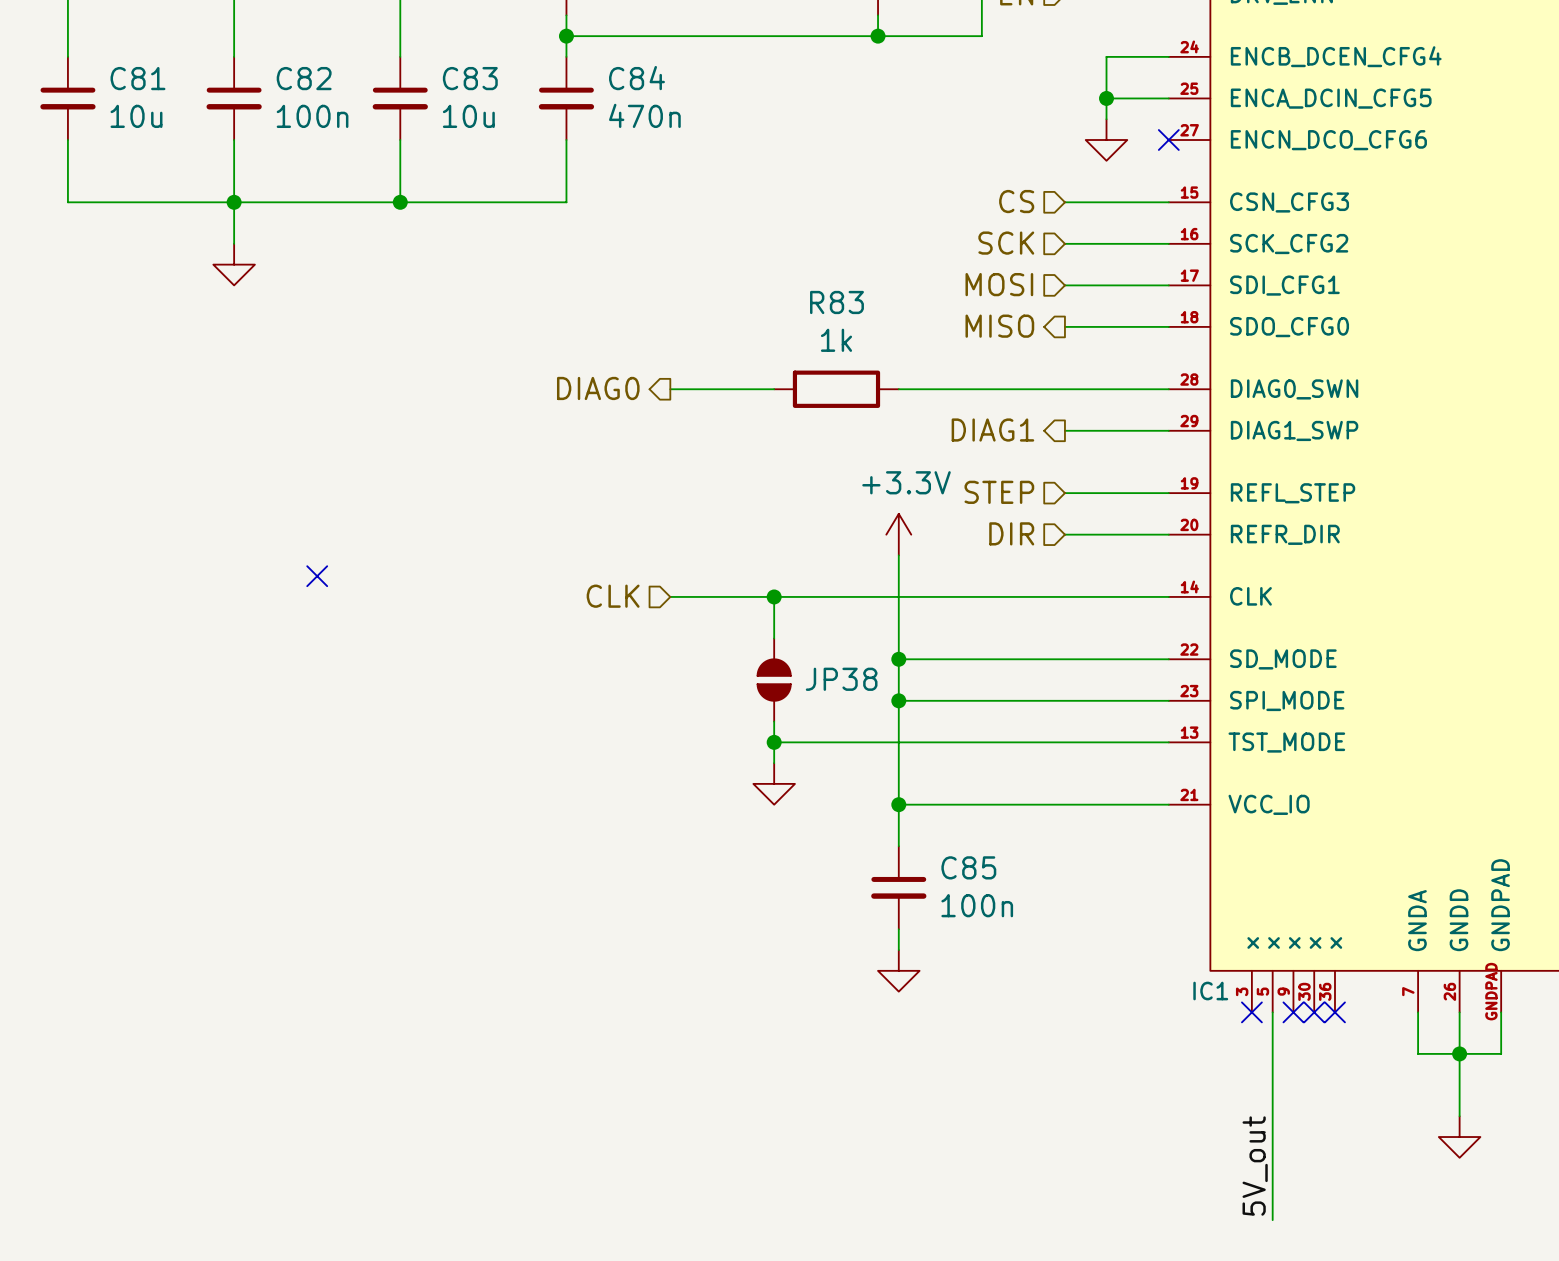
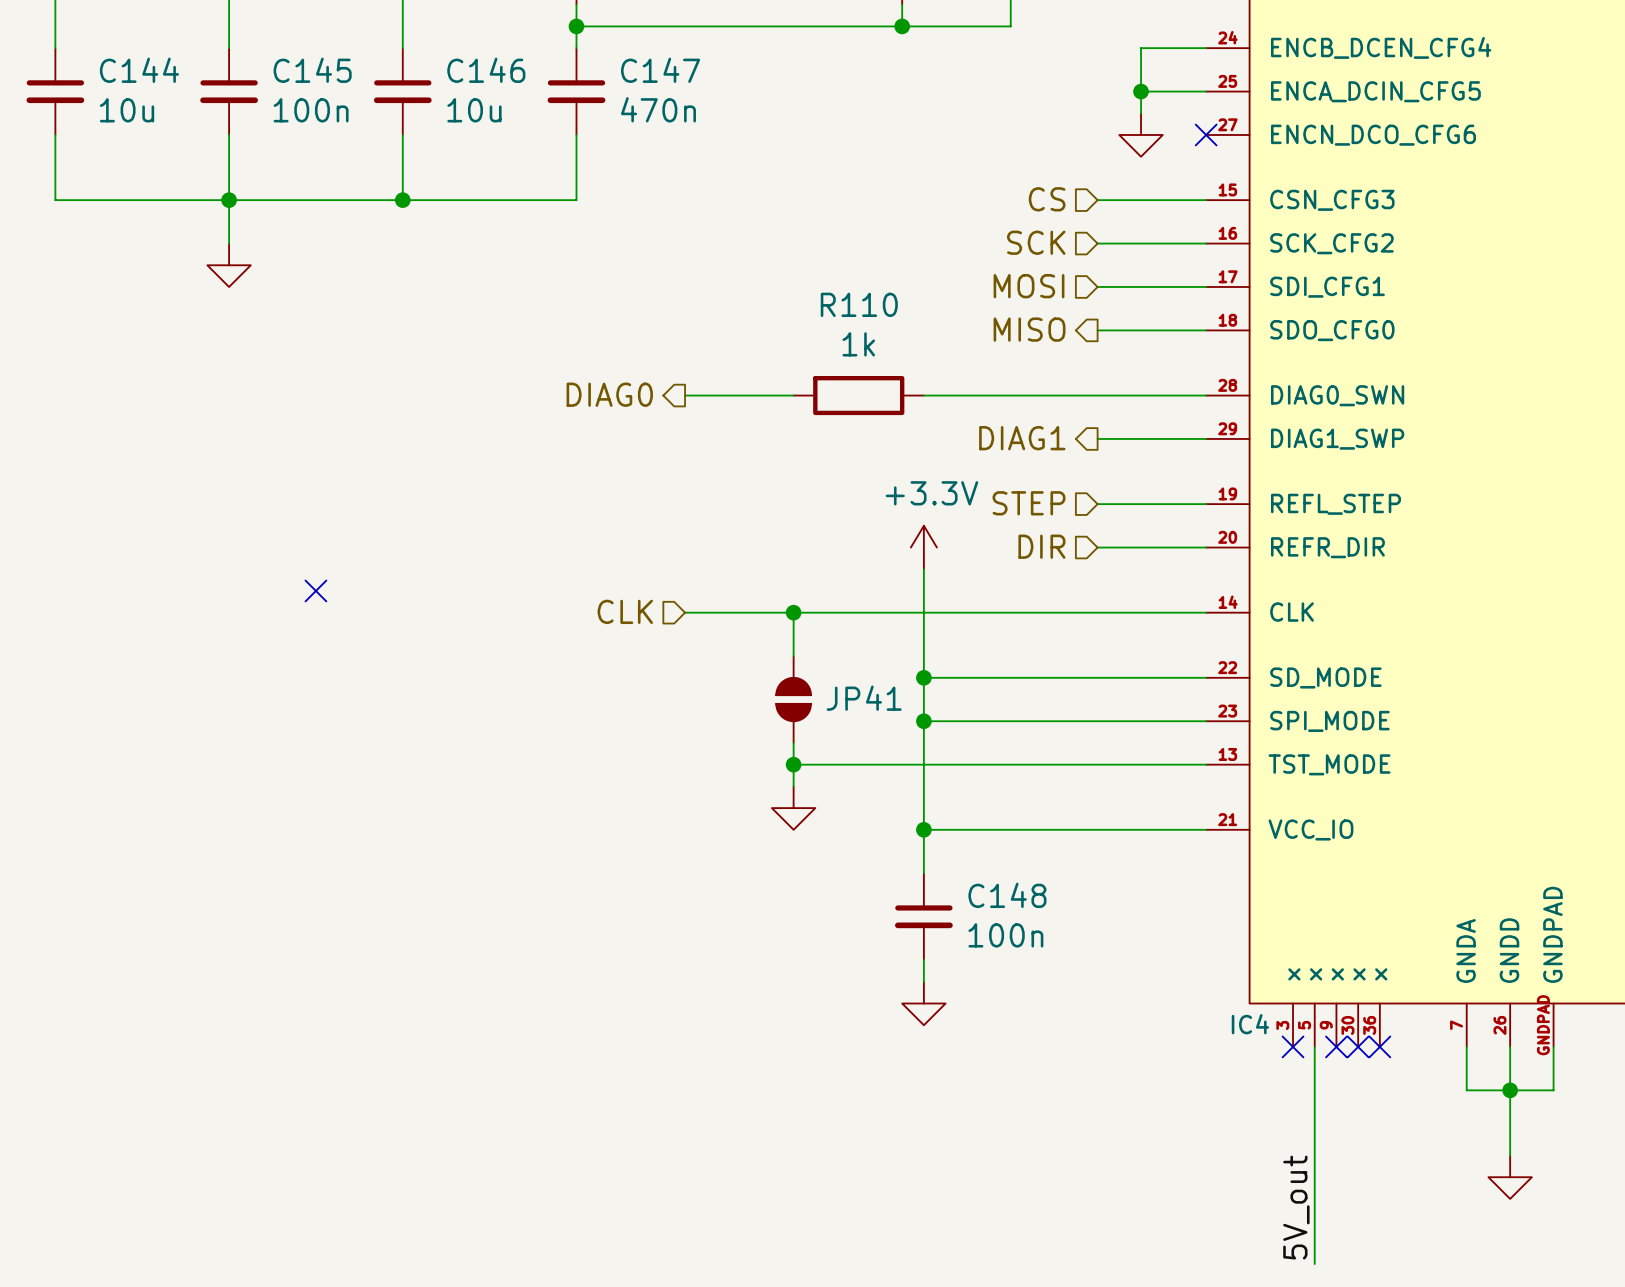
C81 name: C81 (137, 78) -> C144 (139, 70)
C82 name: C82 (304, 78) -> C145 (312, 70)
C83 name: C83 (470, 78) -> C146 (486, 70)
C84 name: C84 (636, 78) -> C147 (660, 70)
R83 name: R83 (836, 302) -> R110 (859, 304)
JP38 name: JP38 (841, 679) -> JP41 (864, 698)
C85 name: C85 (968, 867) -> C148 (1007, 895)
IC1 name: IC1 (1210, 991) -> IC4 (1250, 1024)

